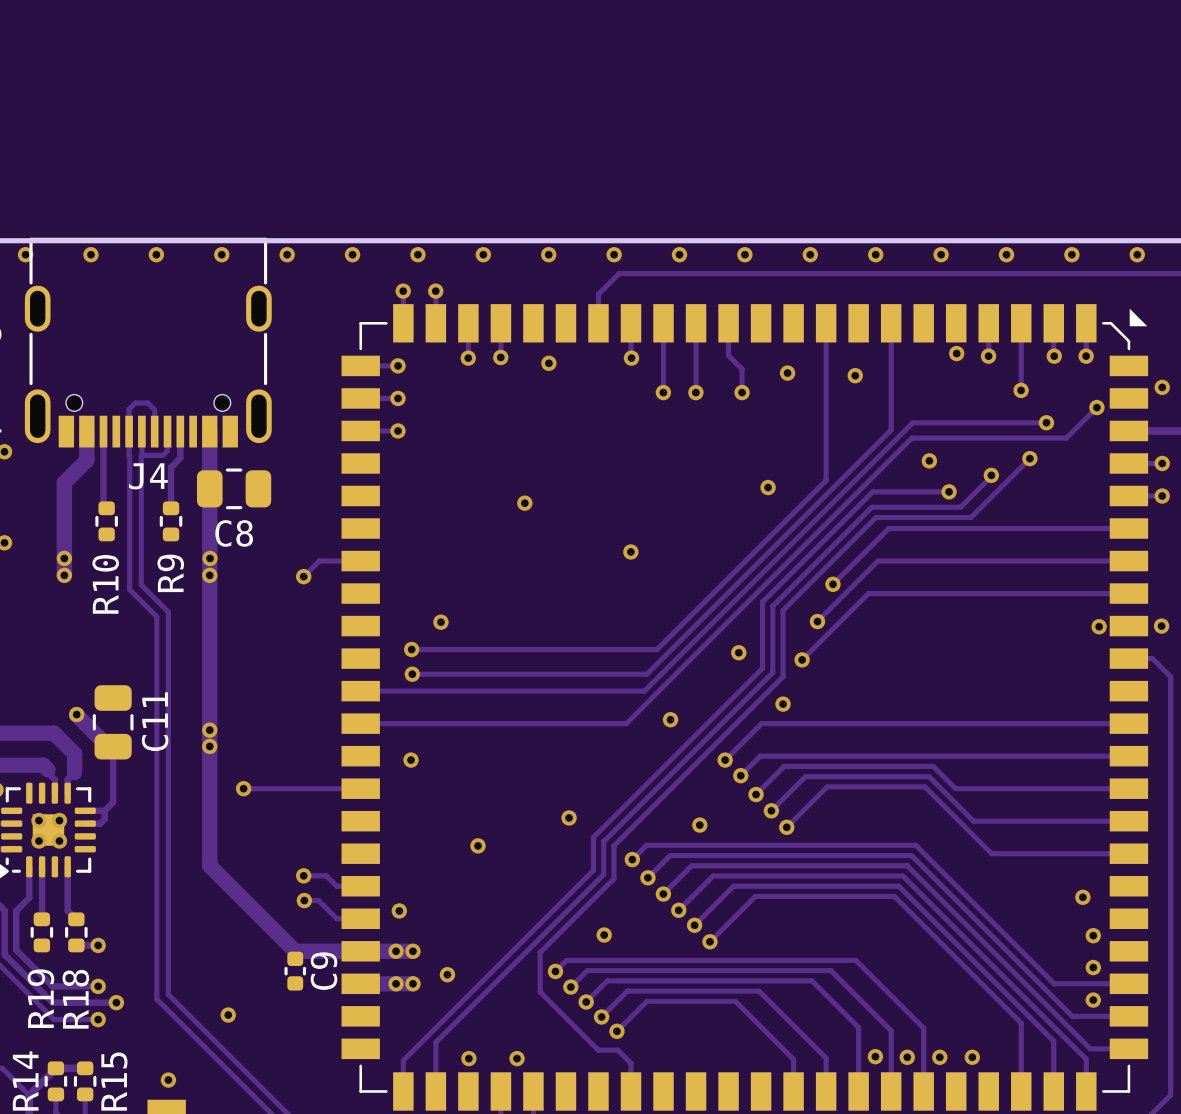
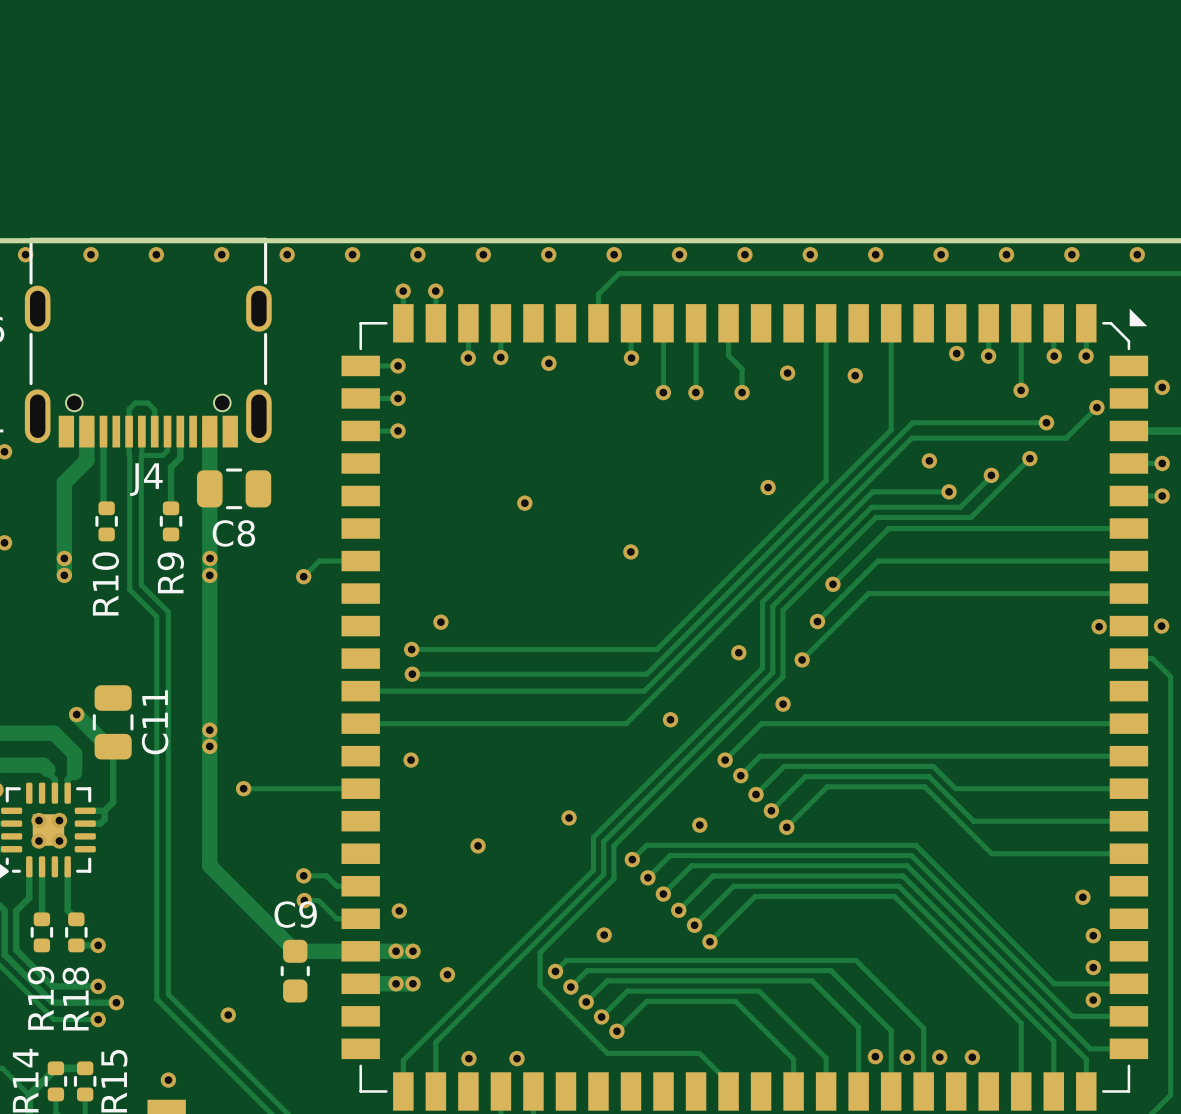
C9 footprint: [284, 951, 307, 991] -> [280, 939, 310, 1003]
C9 name rotation: 0° (324, 971) -> 90° clockwise (295, 914)
track: (540, 986) (540, 991) (598, 1050) (617, 1050) (631, 1063) (631, 1091) -> (540, 986) (607, 1053) (699, 1053) (728, 1082)

